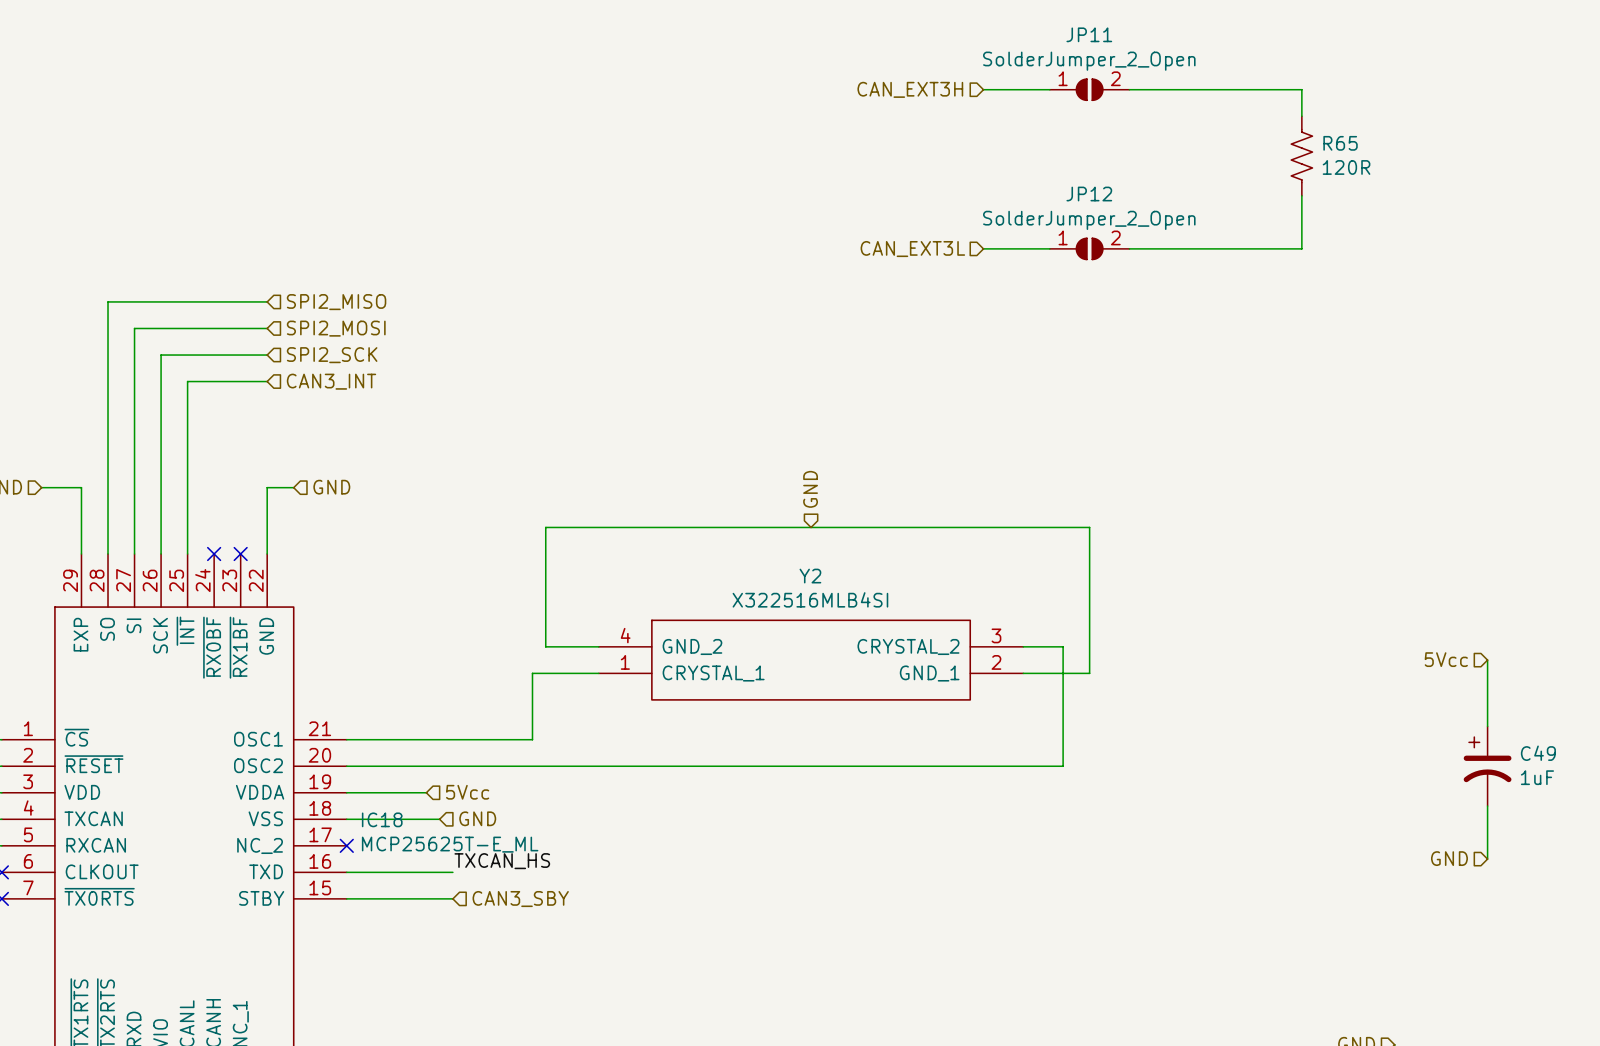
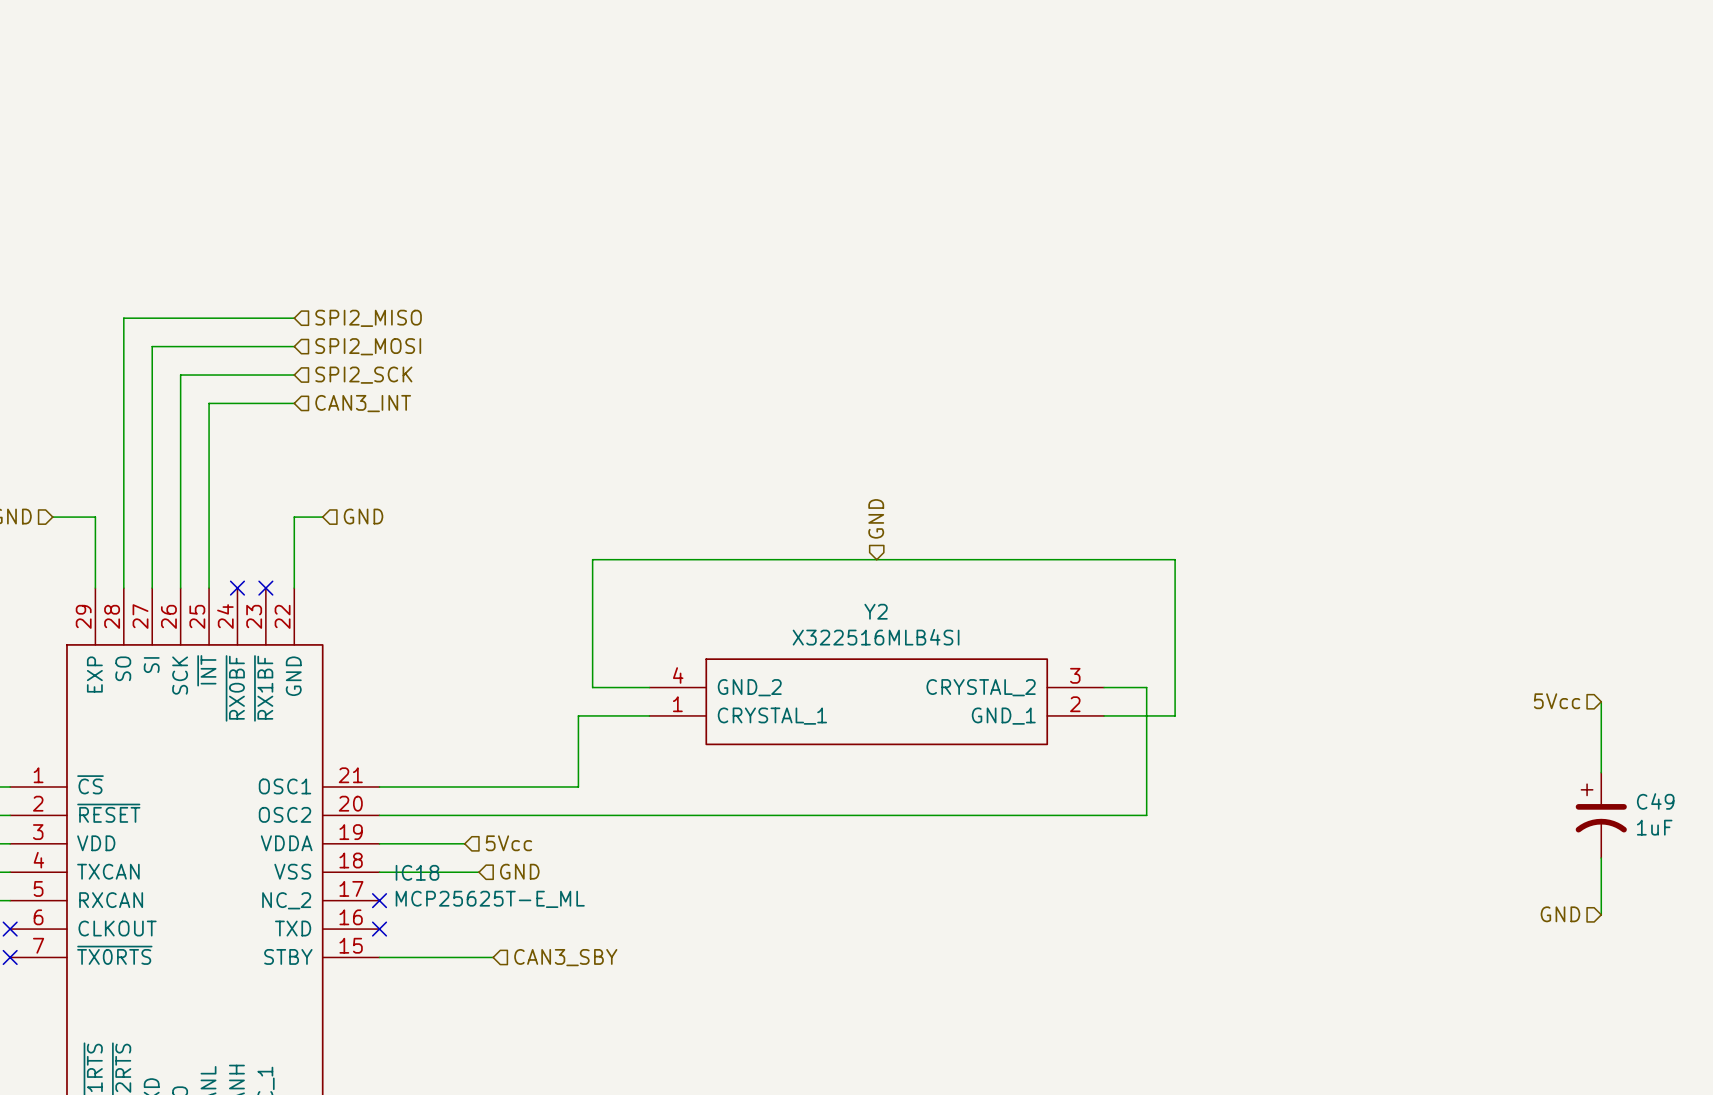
hierarchical label: CAN_EXT3H (910, 89) -> none
wire: (983, 89) (1049, 89) -> none
JP11: SolderJumper_2_Open (1089, 89) -> none
wire: (1129, 89) (1301, 89) (1301, 116) -> none
R65: 120R (1301, 156) -> none
wire: (1301, 195) (1301, 248) (1129, 248) -> none
wire: (983, 248) (1049, 248) -> none
JP12: SolderJumper_2_Open (1089, 248) -> none
hierarchical label: CAN_EXT3L (912, 249) -> none
label: TXCAN_HS (502, 861) -> none
wire: (346, 872) (452, 872) -> none
no-connect mark: none -> (379, 929)

